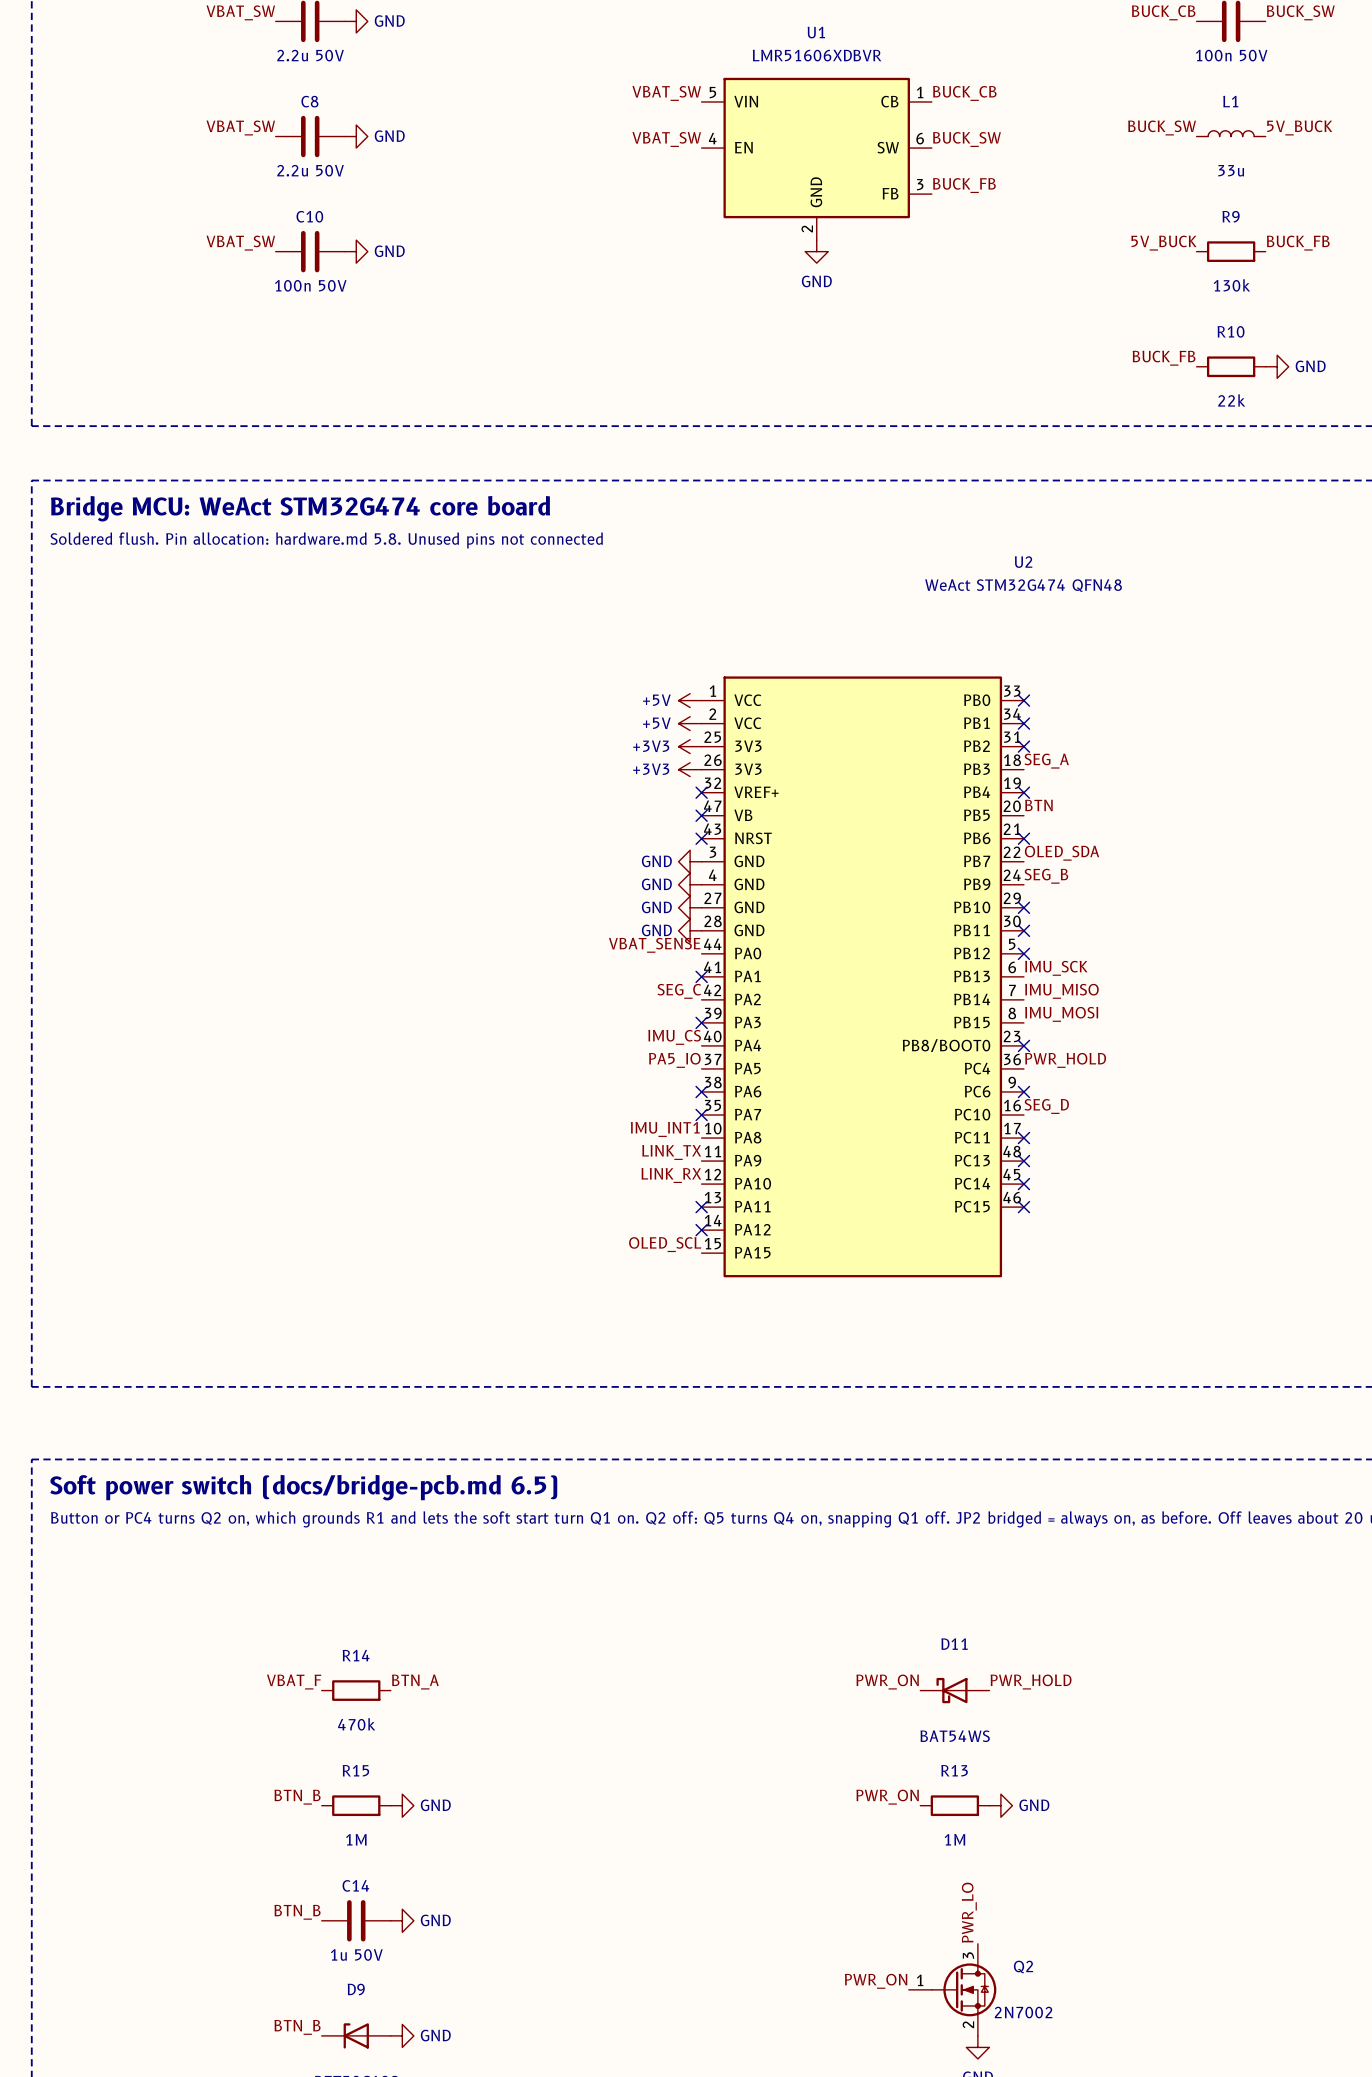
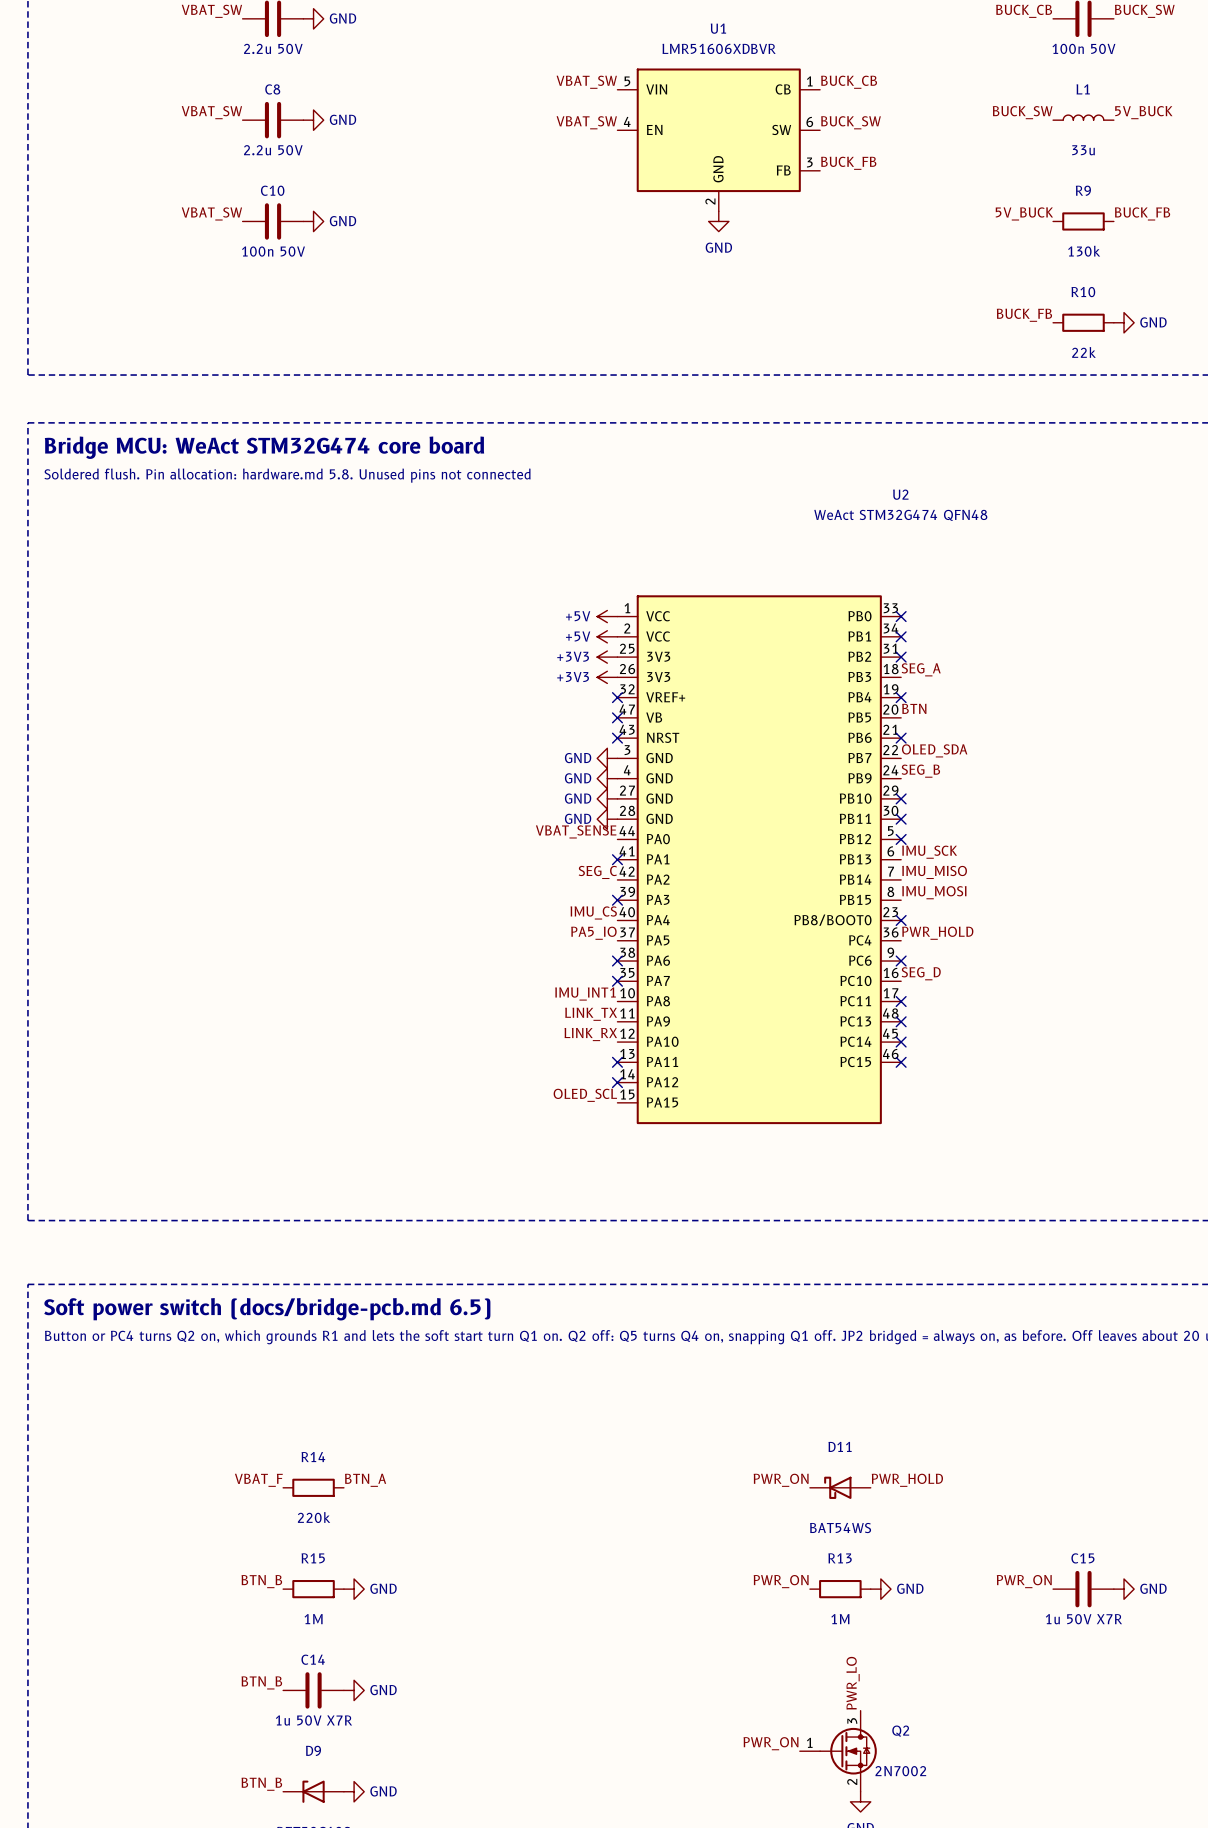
R14 value: 470k (356, 1724) -> 220k (314, 1517)
label: none -> PWR_ON (1024, 1581)
C15: none -> 1u 50V X7R (1083, 1589)
power symbol: none -> GND (1124, 1589)
C14 value: 1u 50V (356, 1954) -> 1u 50V X7R (313, 1720)

